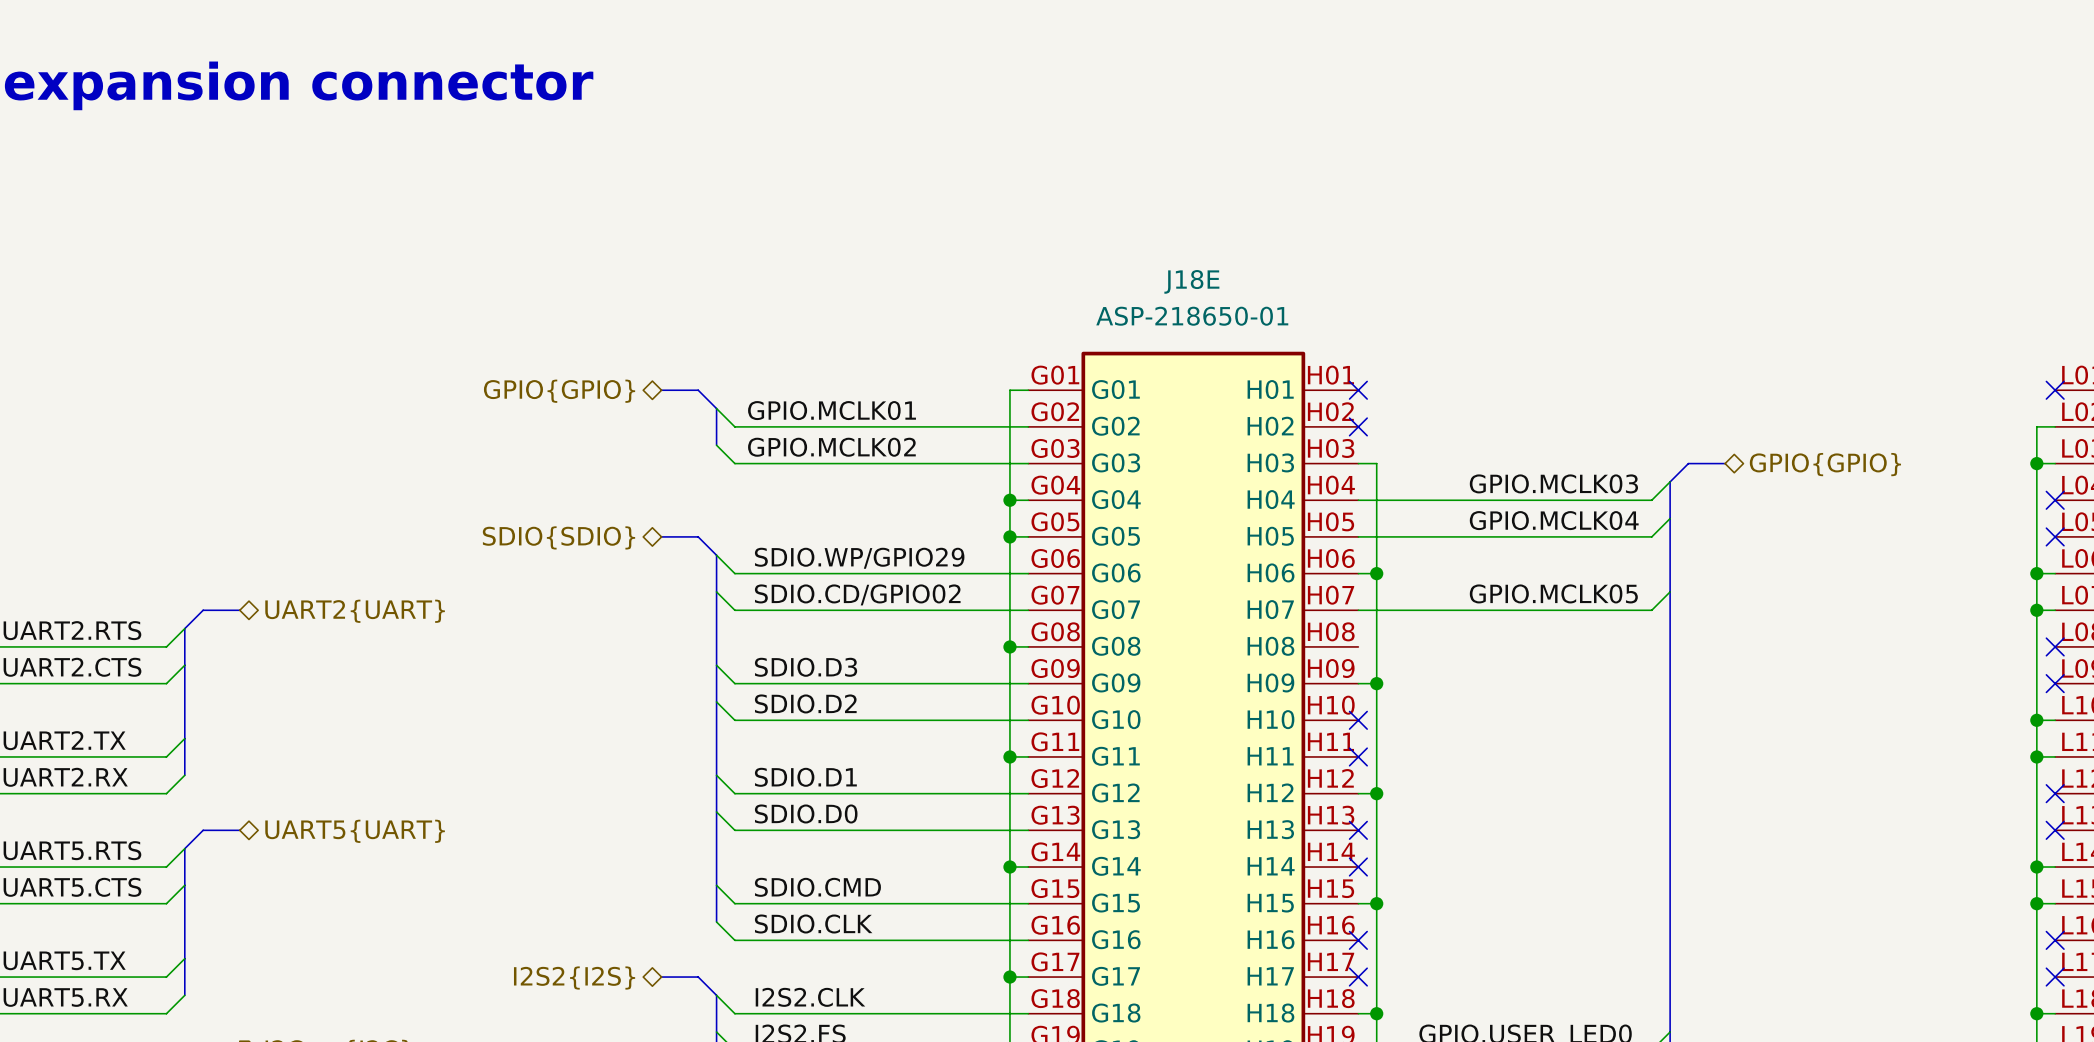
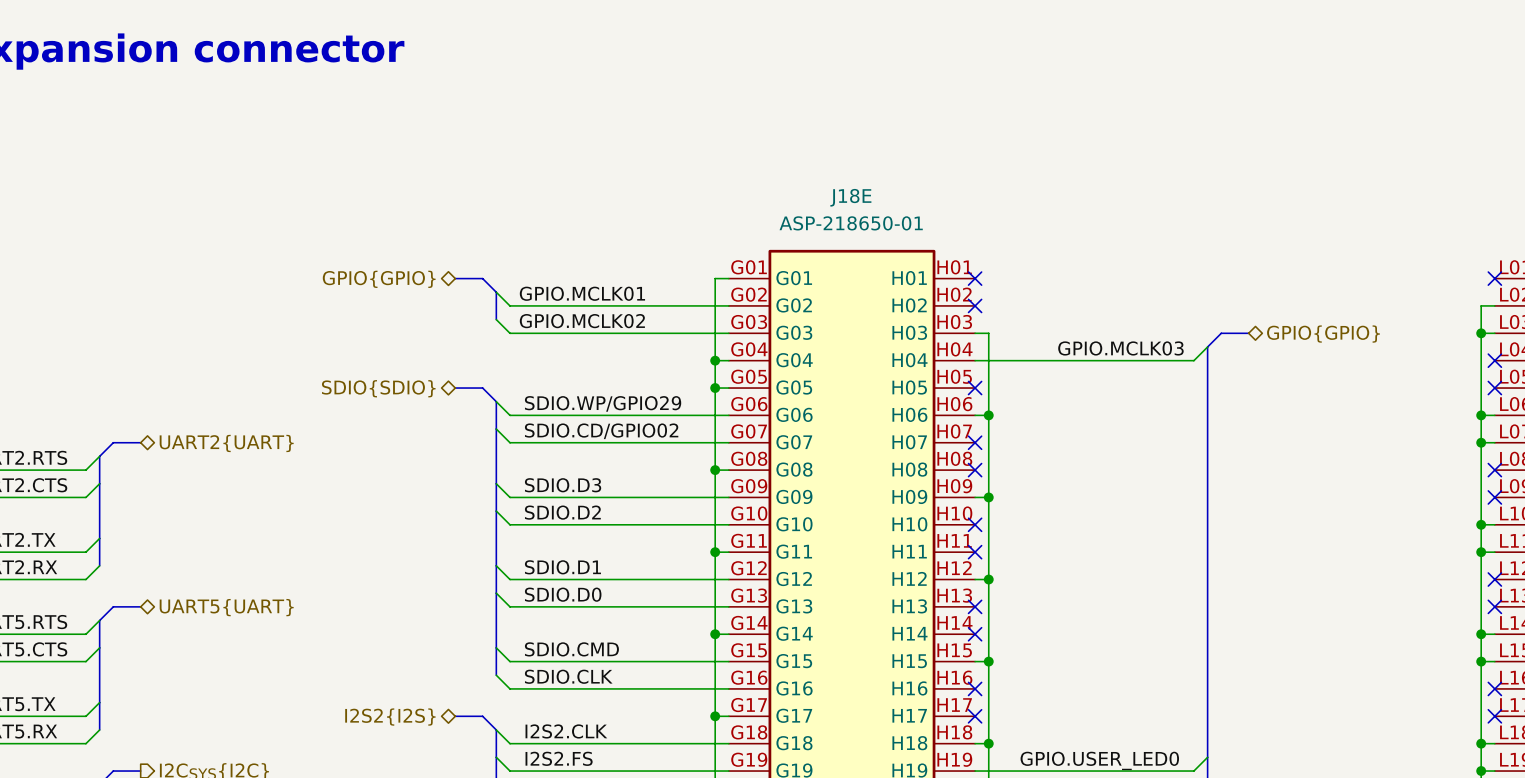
wire: (1670, 518) (1651, 536) (1358, 536) -> none
label: GPIO.MCLK04 (1554, 520) -> none
no-connect mark: none -> (975, 388)
wire: (1670, 591) (1651, 610) (1358, 610) -> none
label: GPIO.MCLK05 (1553, 593) -> none
no-connect mark: none -> (975, 442)
no-connect mark: none -> (975, 470)

